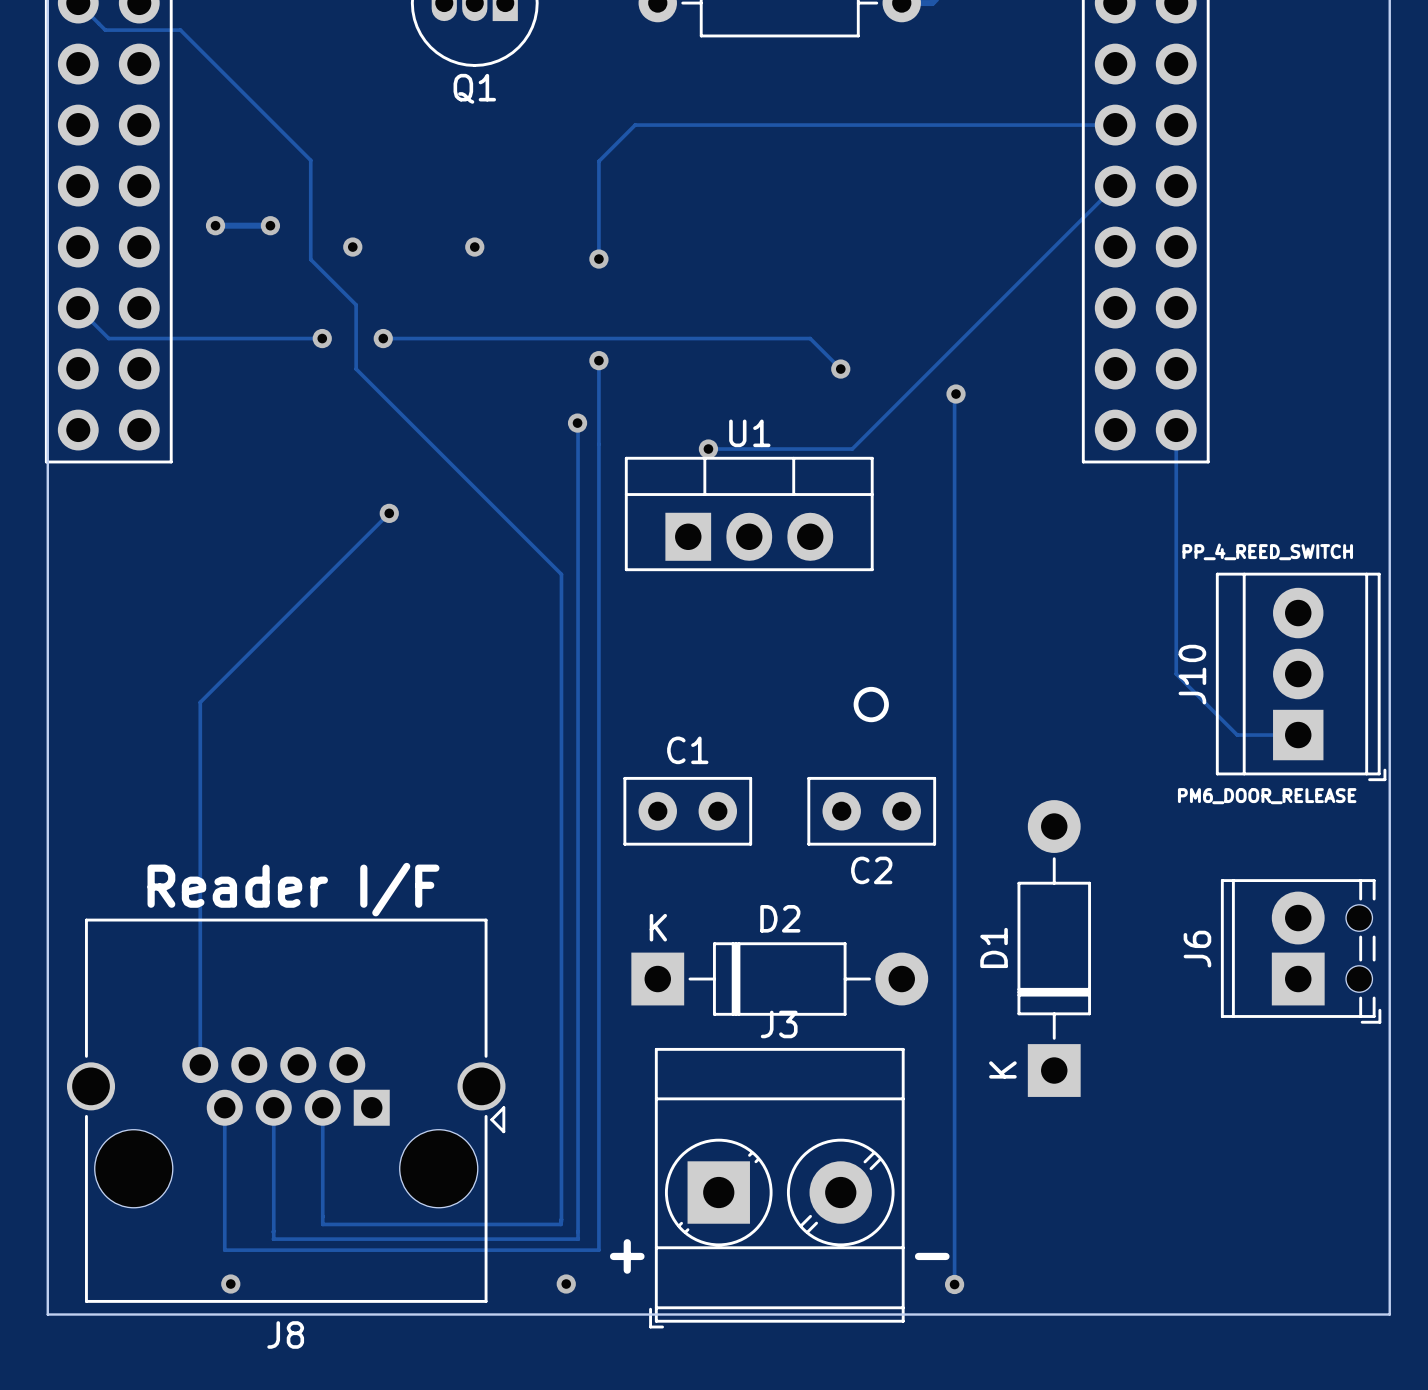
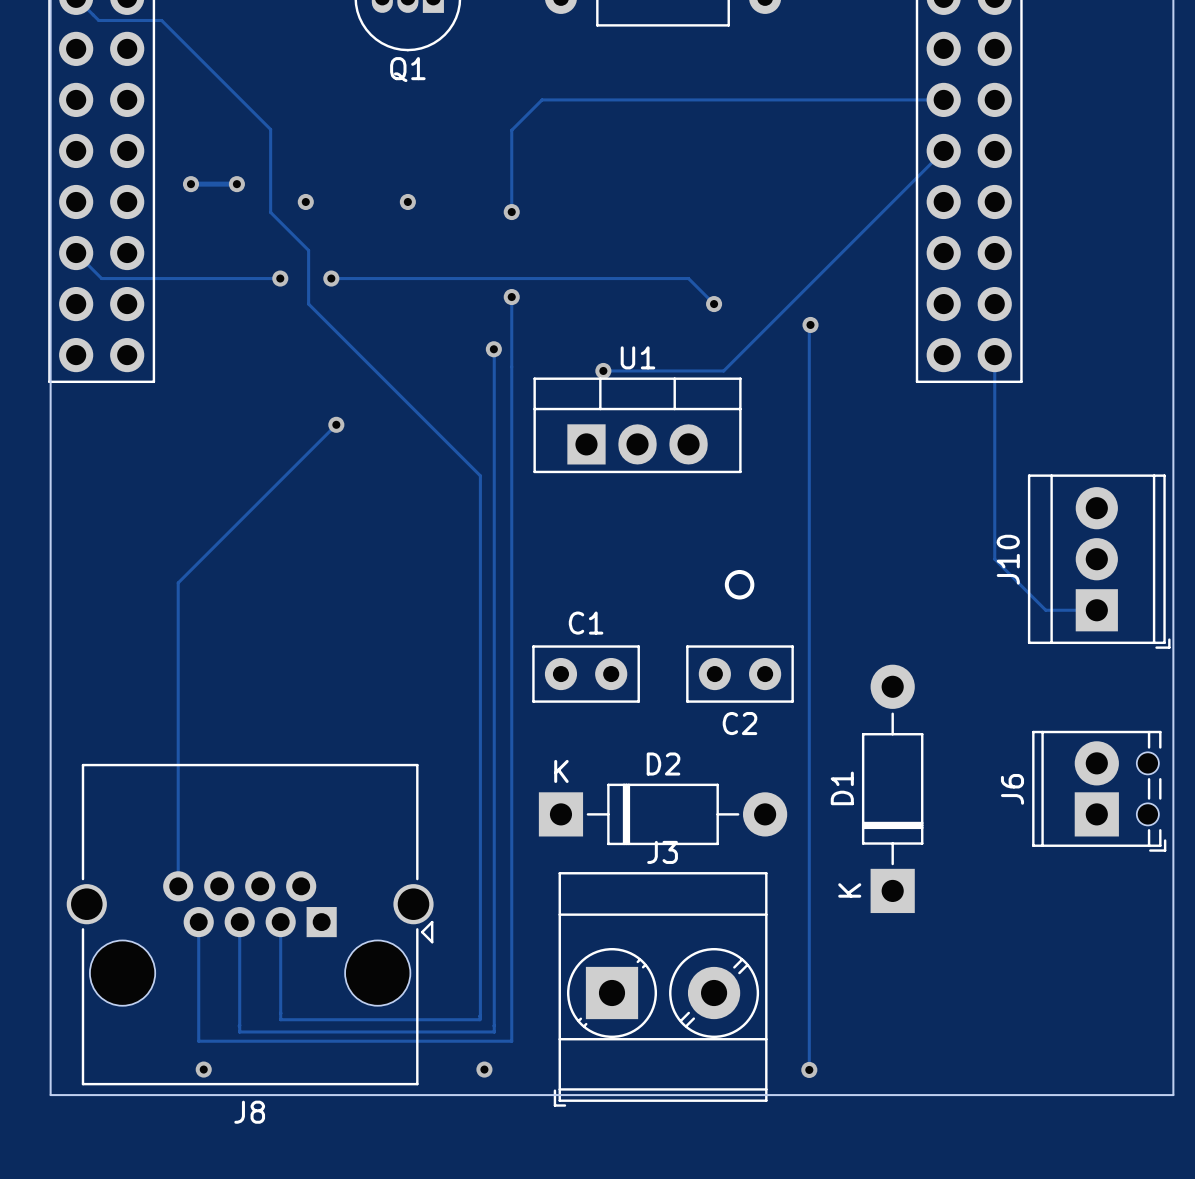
text: PP_4_REED_SWITCH (1267, 551) -> none
text: PM6_DOOR_RELEASE (1267, 796) -> none
text: Reader I/F (293, 889) -> none
text: + (627, 1256) -> none
text: - (932, 1256) -> none

